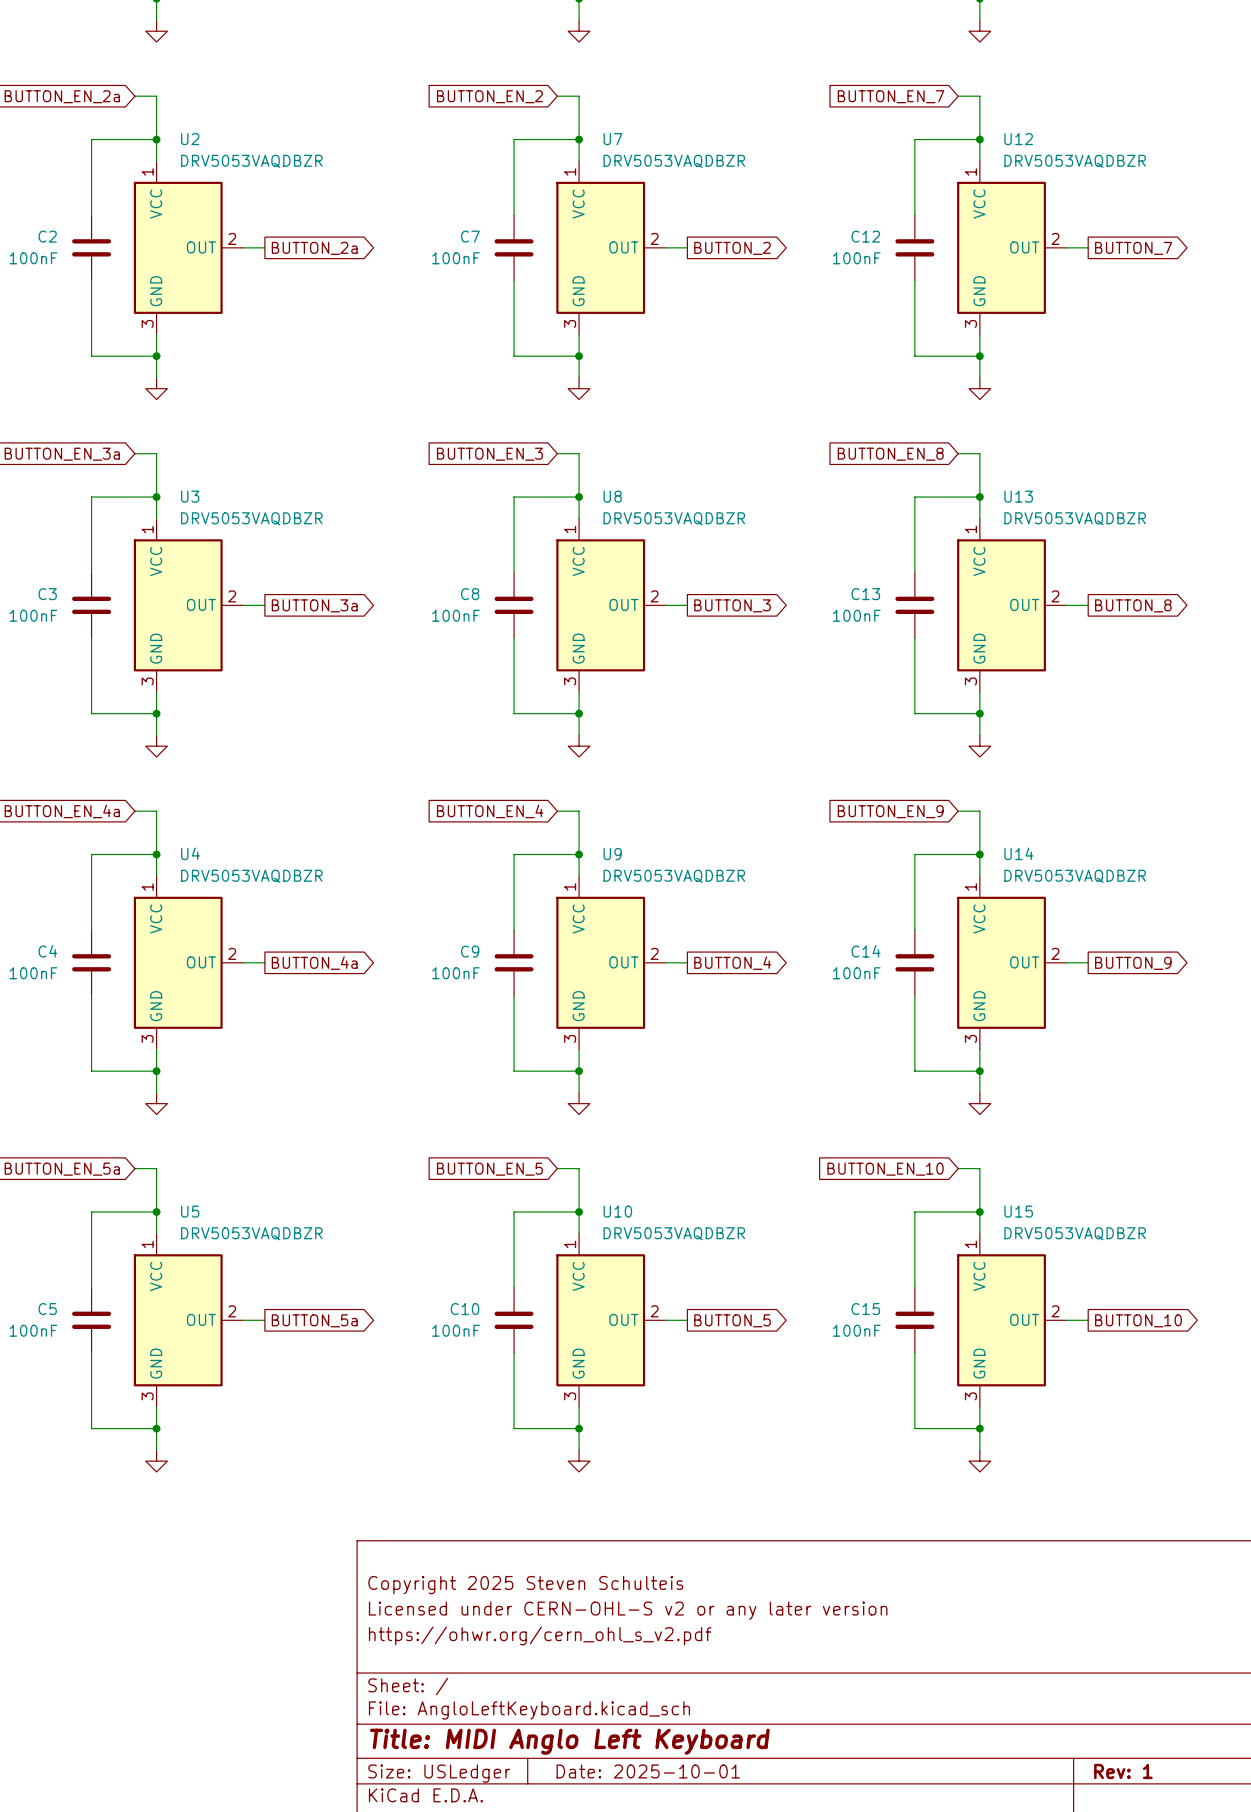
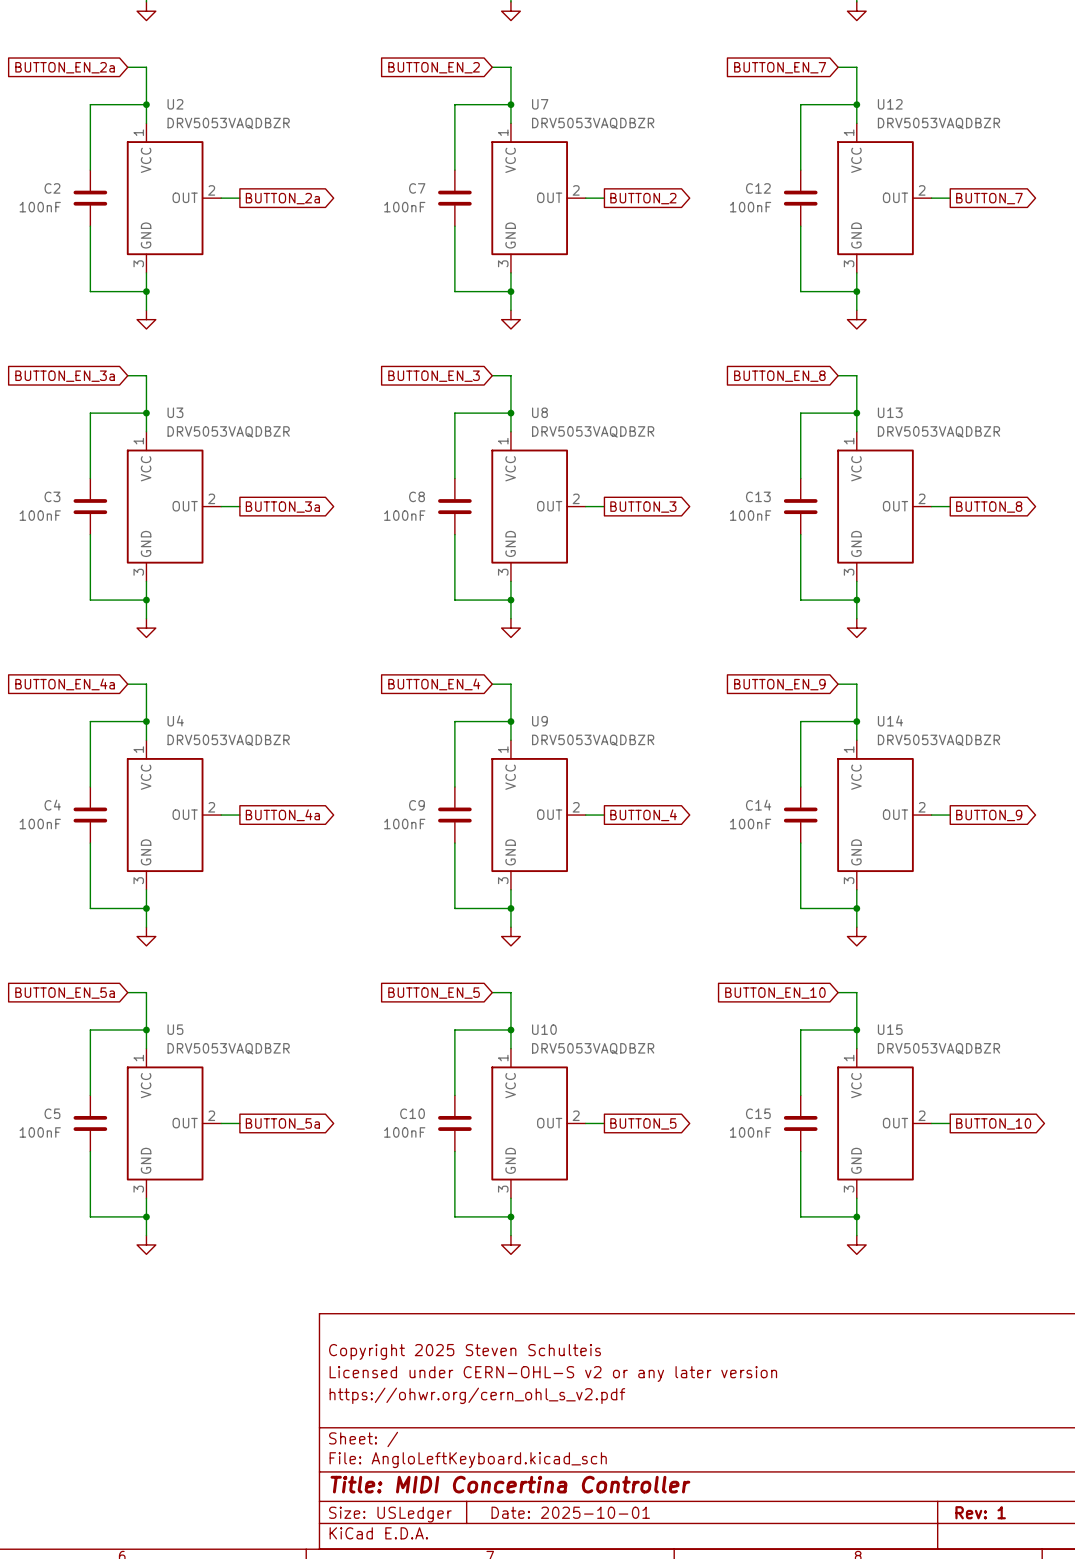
title block: Title: MIDI Anglo Left Keyboard (569, 1741) -> Title: MIDI Concertina Controller (510, 1484)

